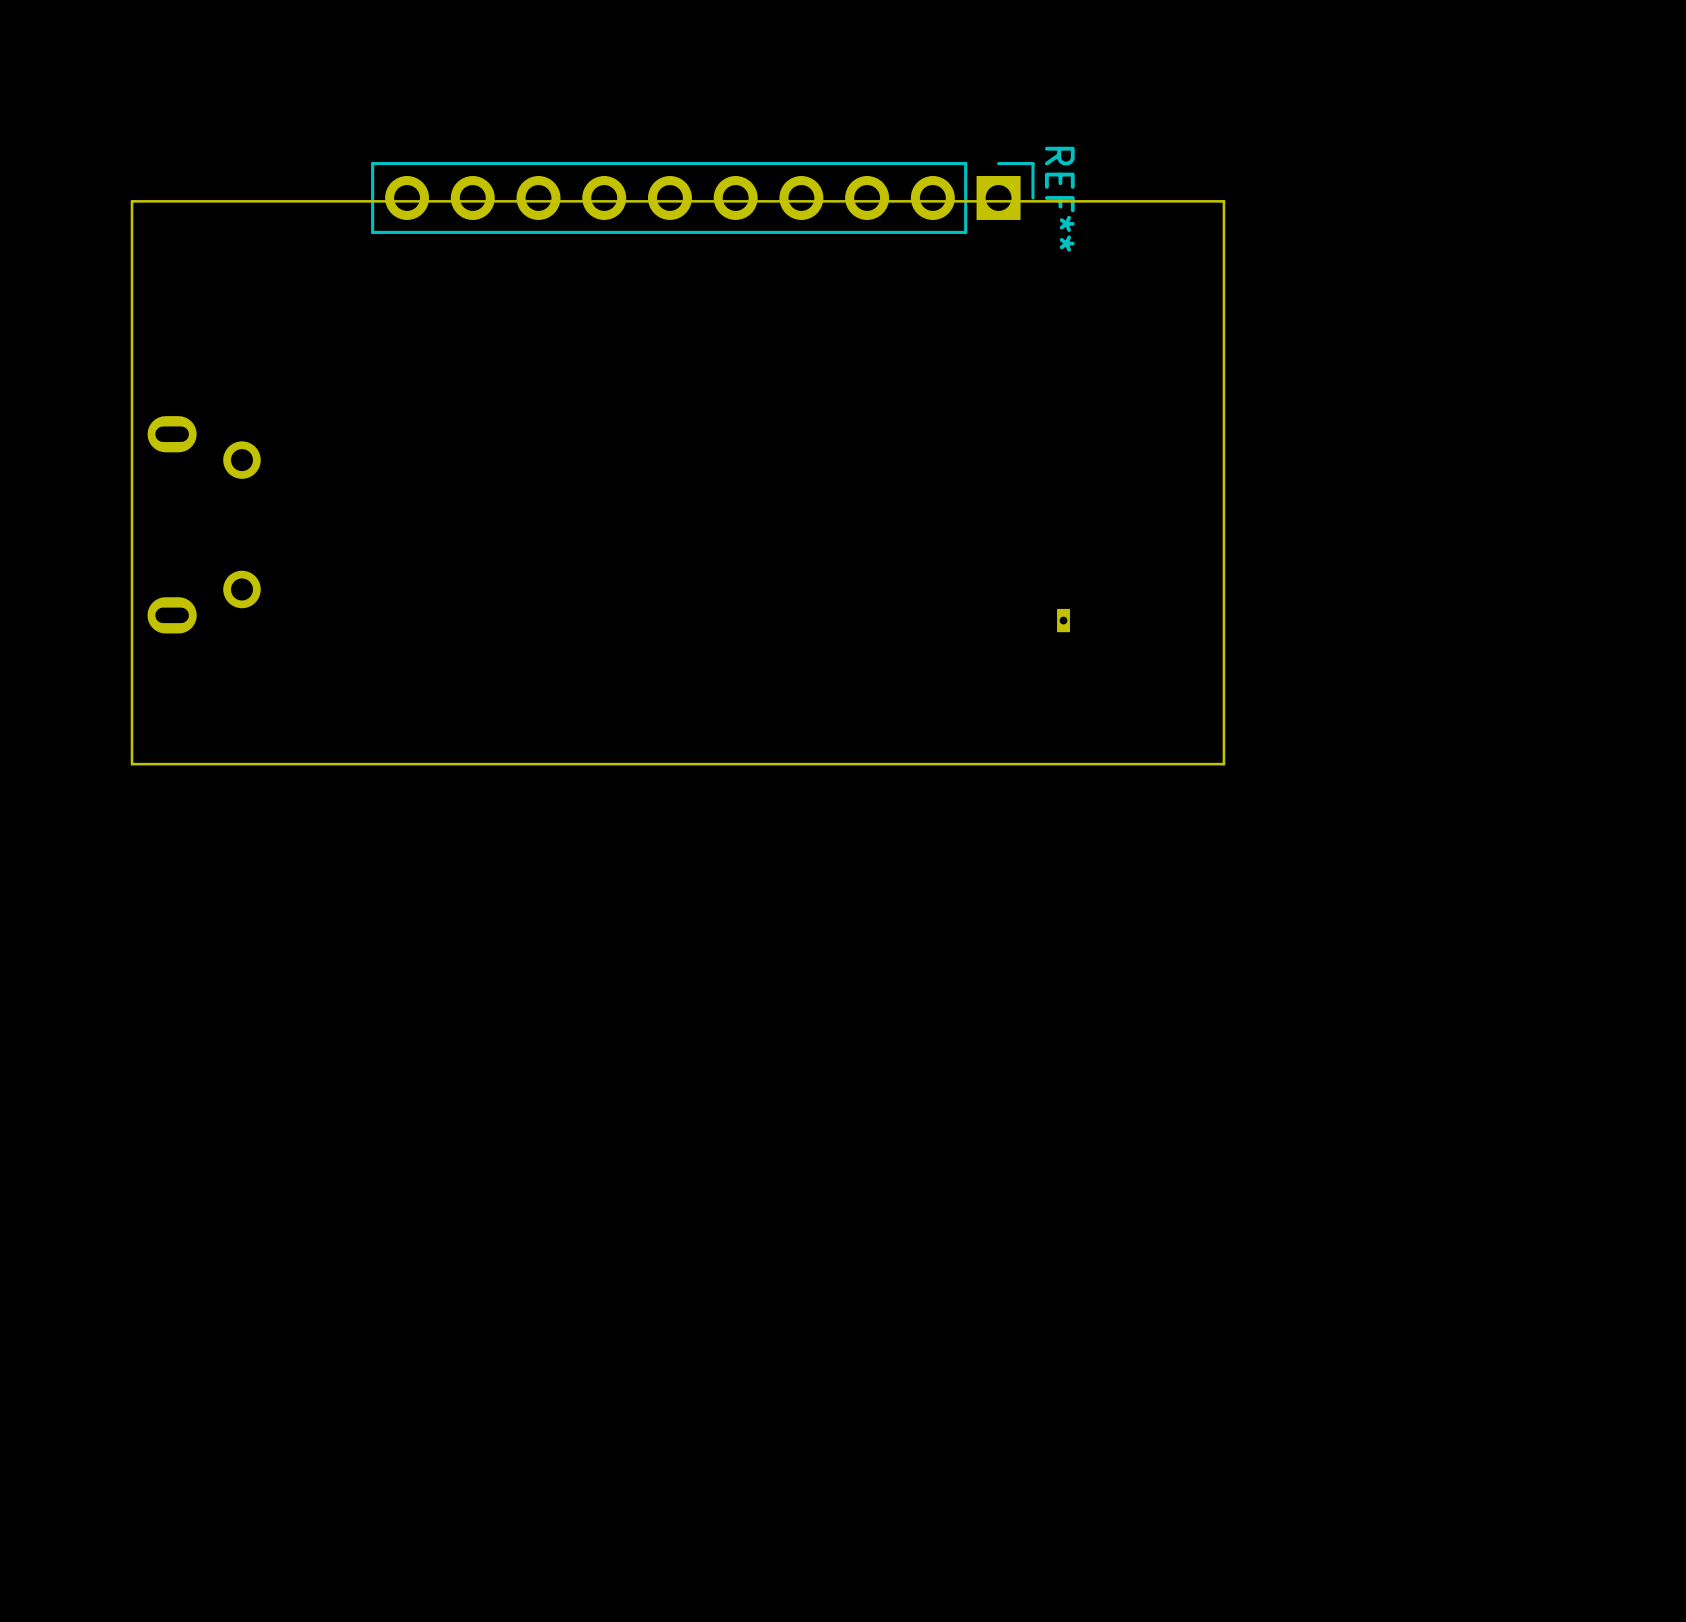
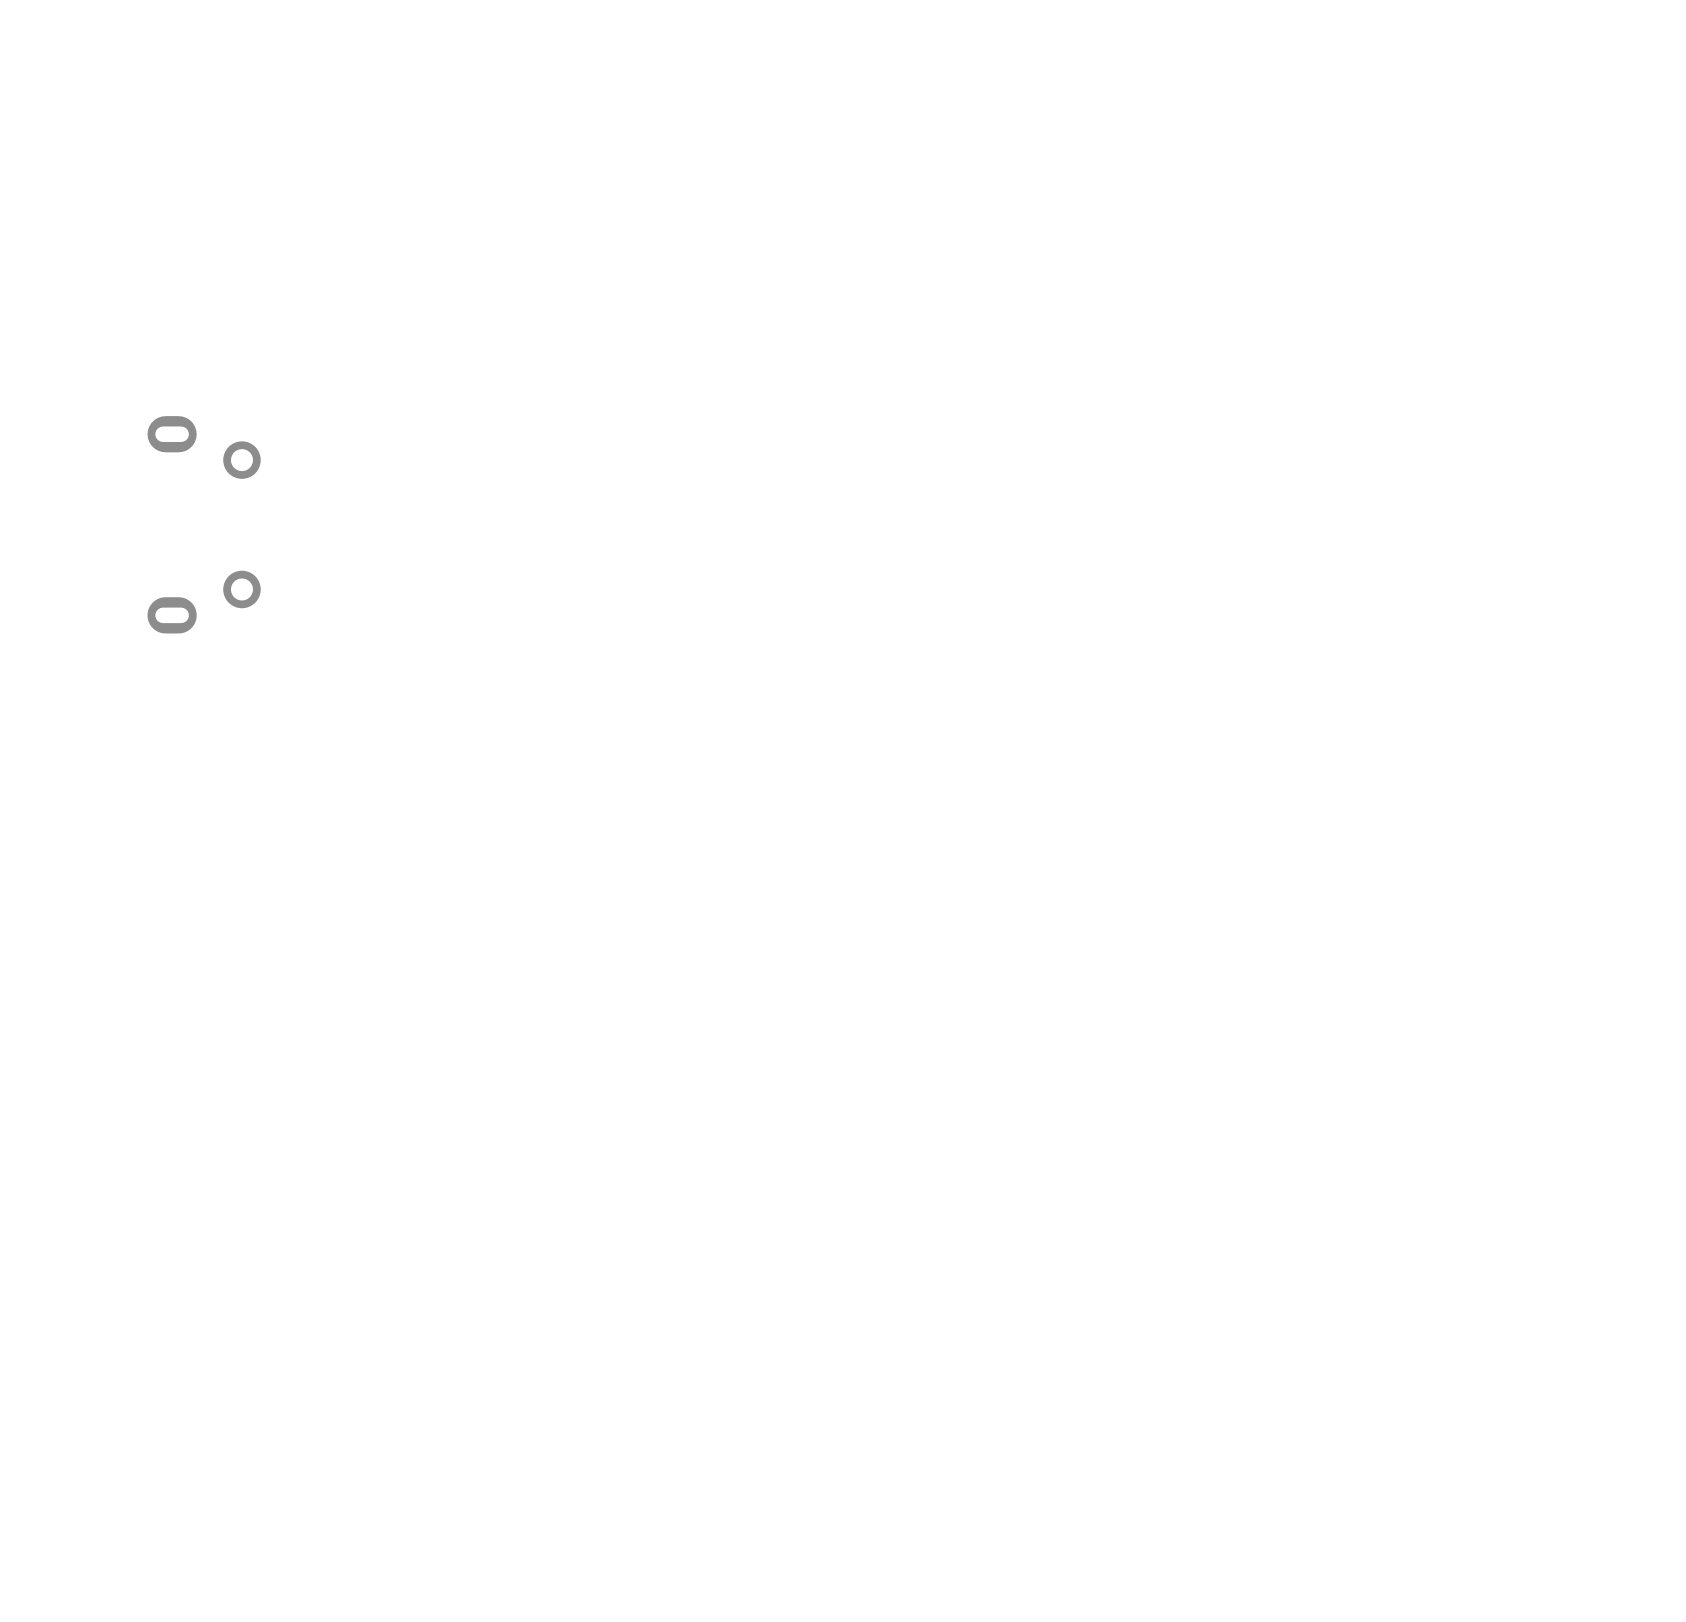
REF**: (702, 197) -> none
board edge: (1223, 201) (132, 201) (132, 764) (1223, 764) (1223, 201) -> none
part: (1063, 620) -> none

